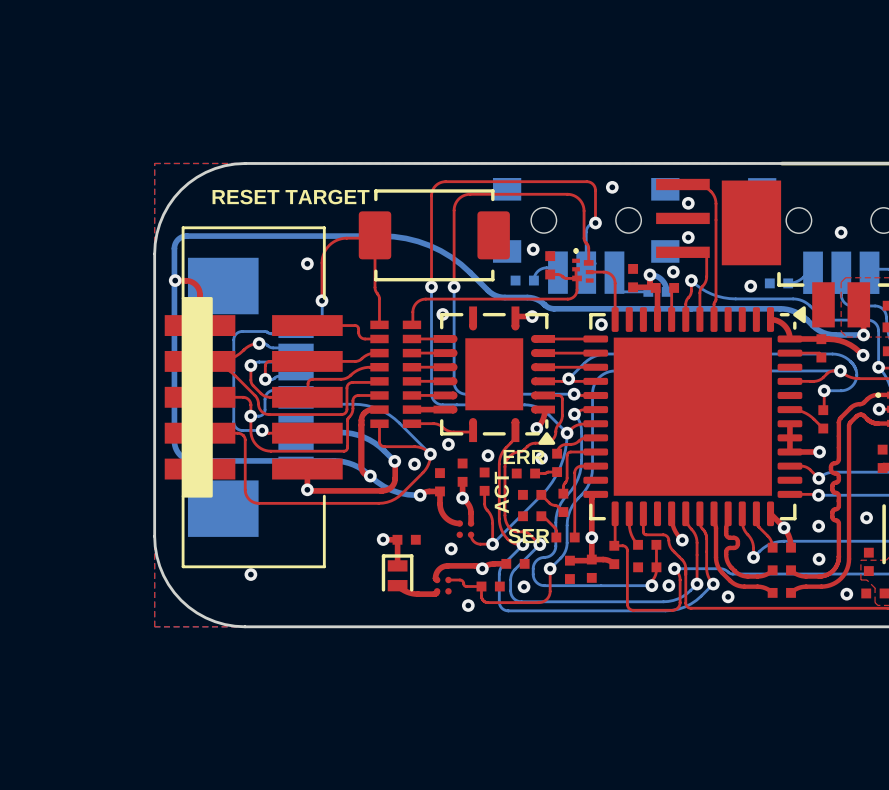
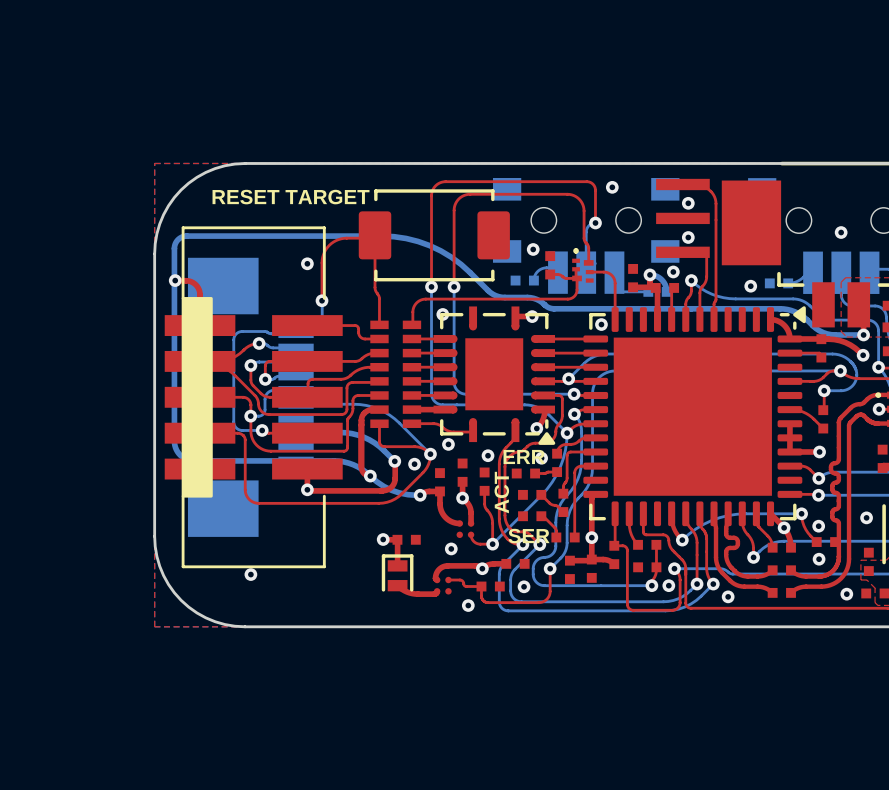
bottom track: none -> (801, 513) (728, 515) (703, 524) (682, 540)
via: none -> (801, 513)
top track: none -> (801, 515) (805, 529) (816, 542)
part: none -> (825, 542)

